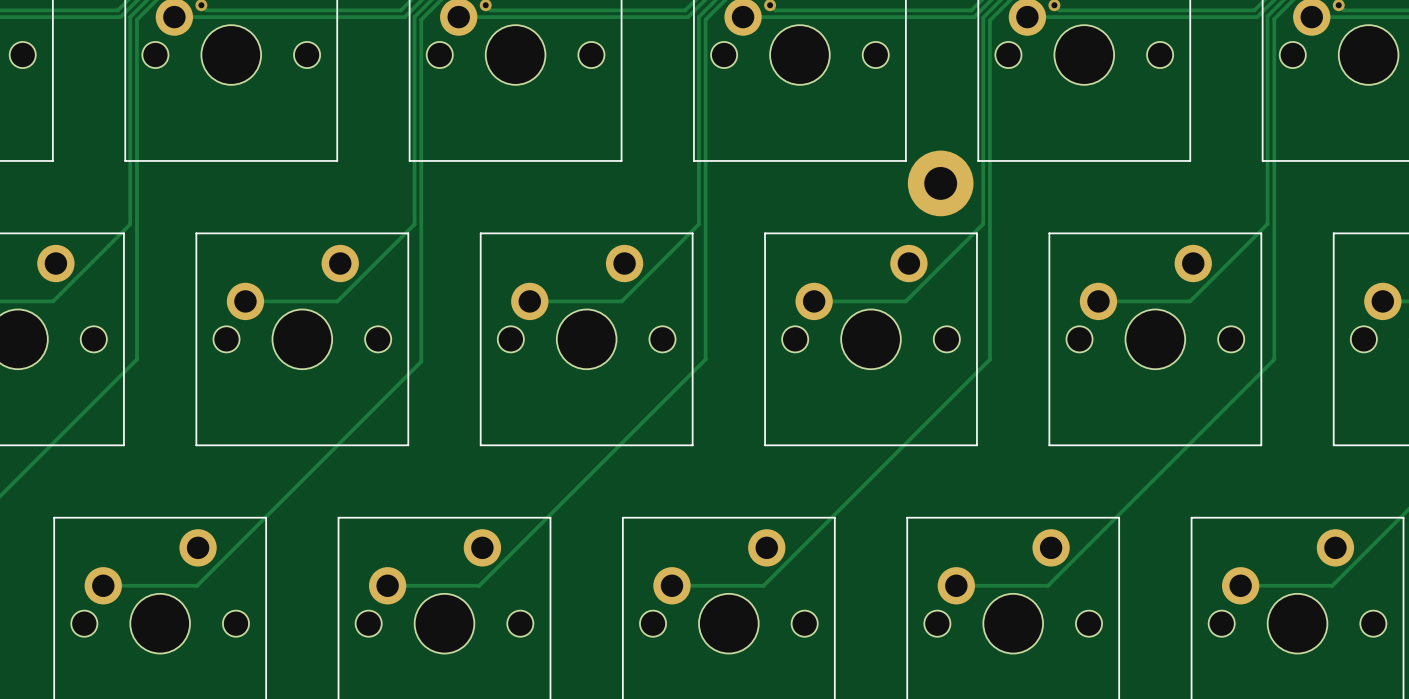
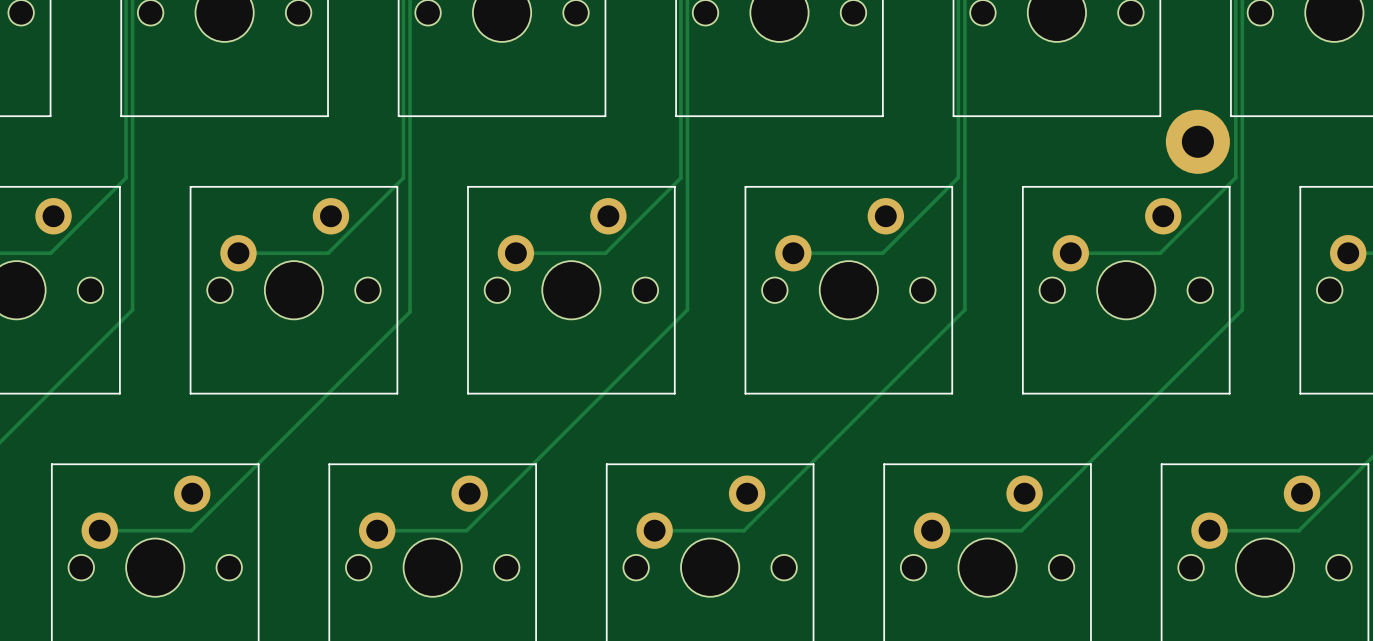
part position: (940, 183) -> (1197, 141)

